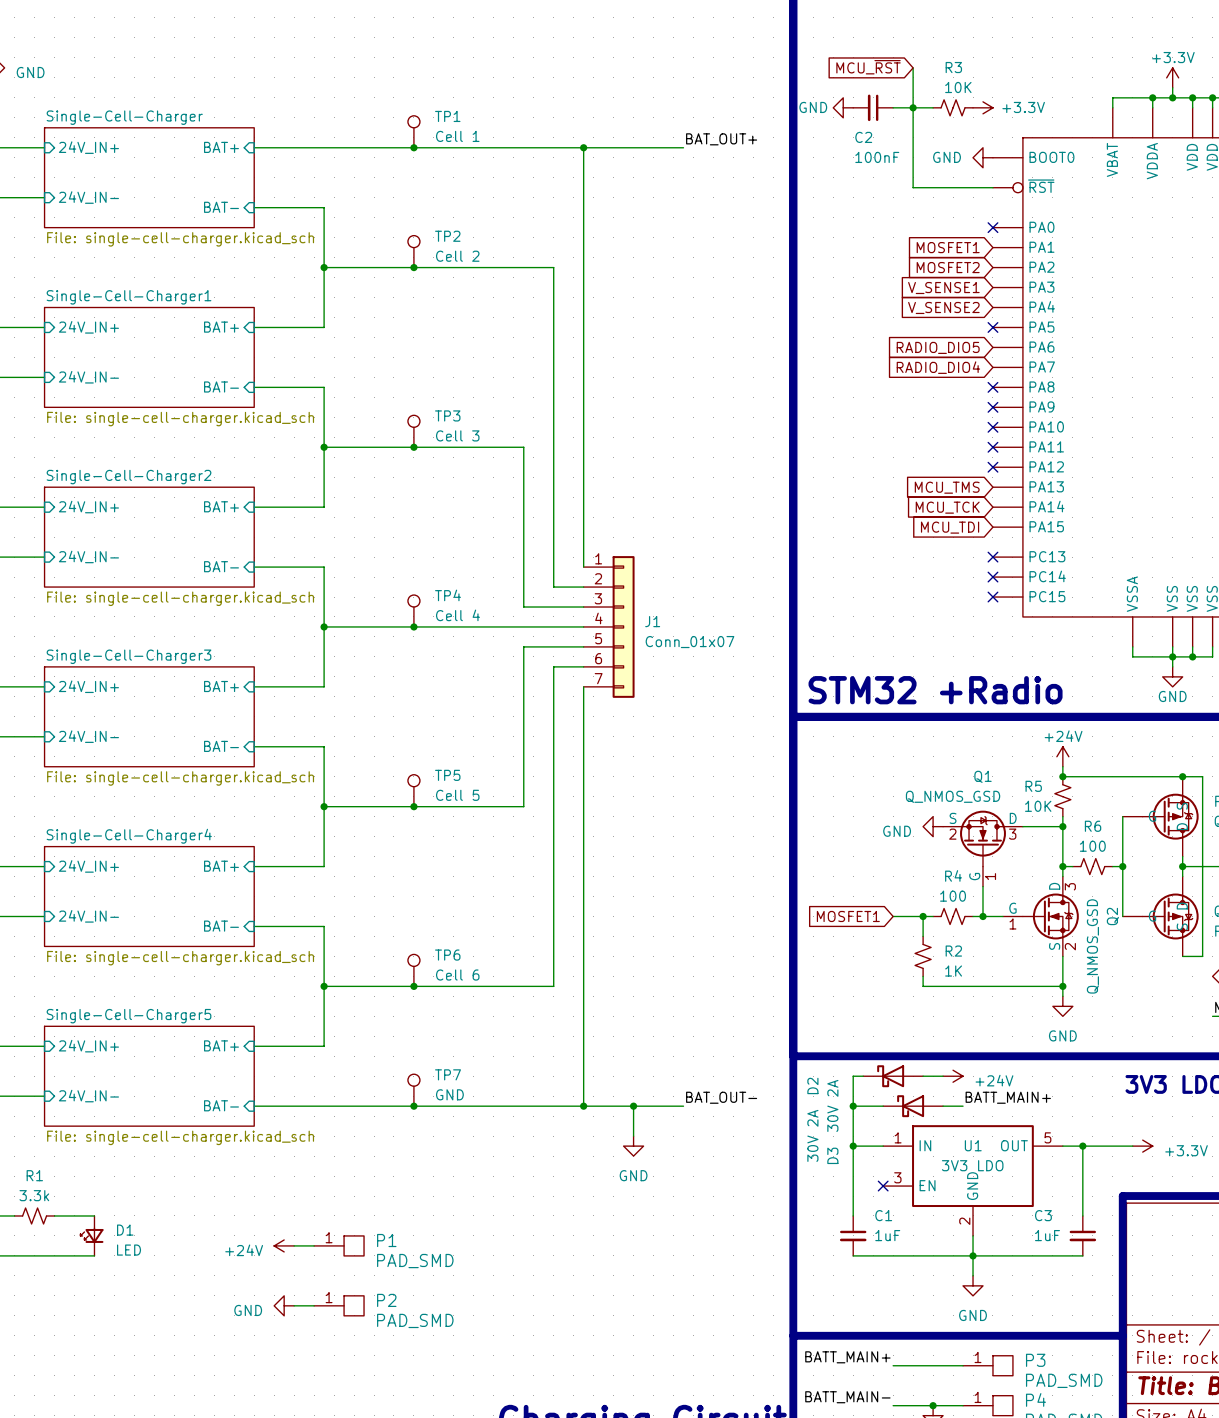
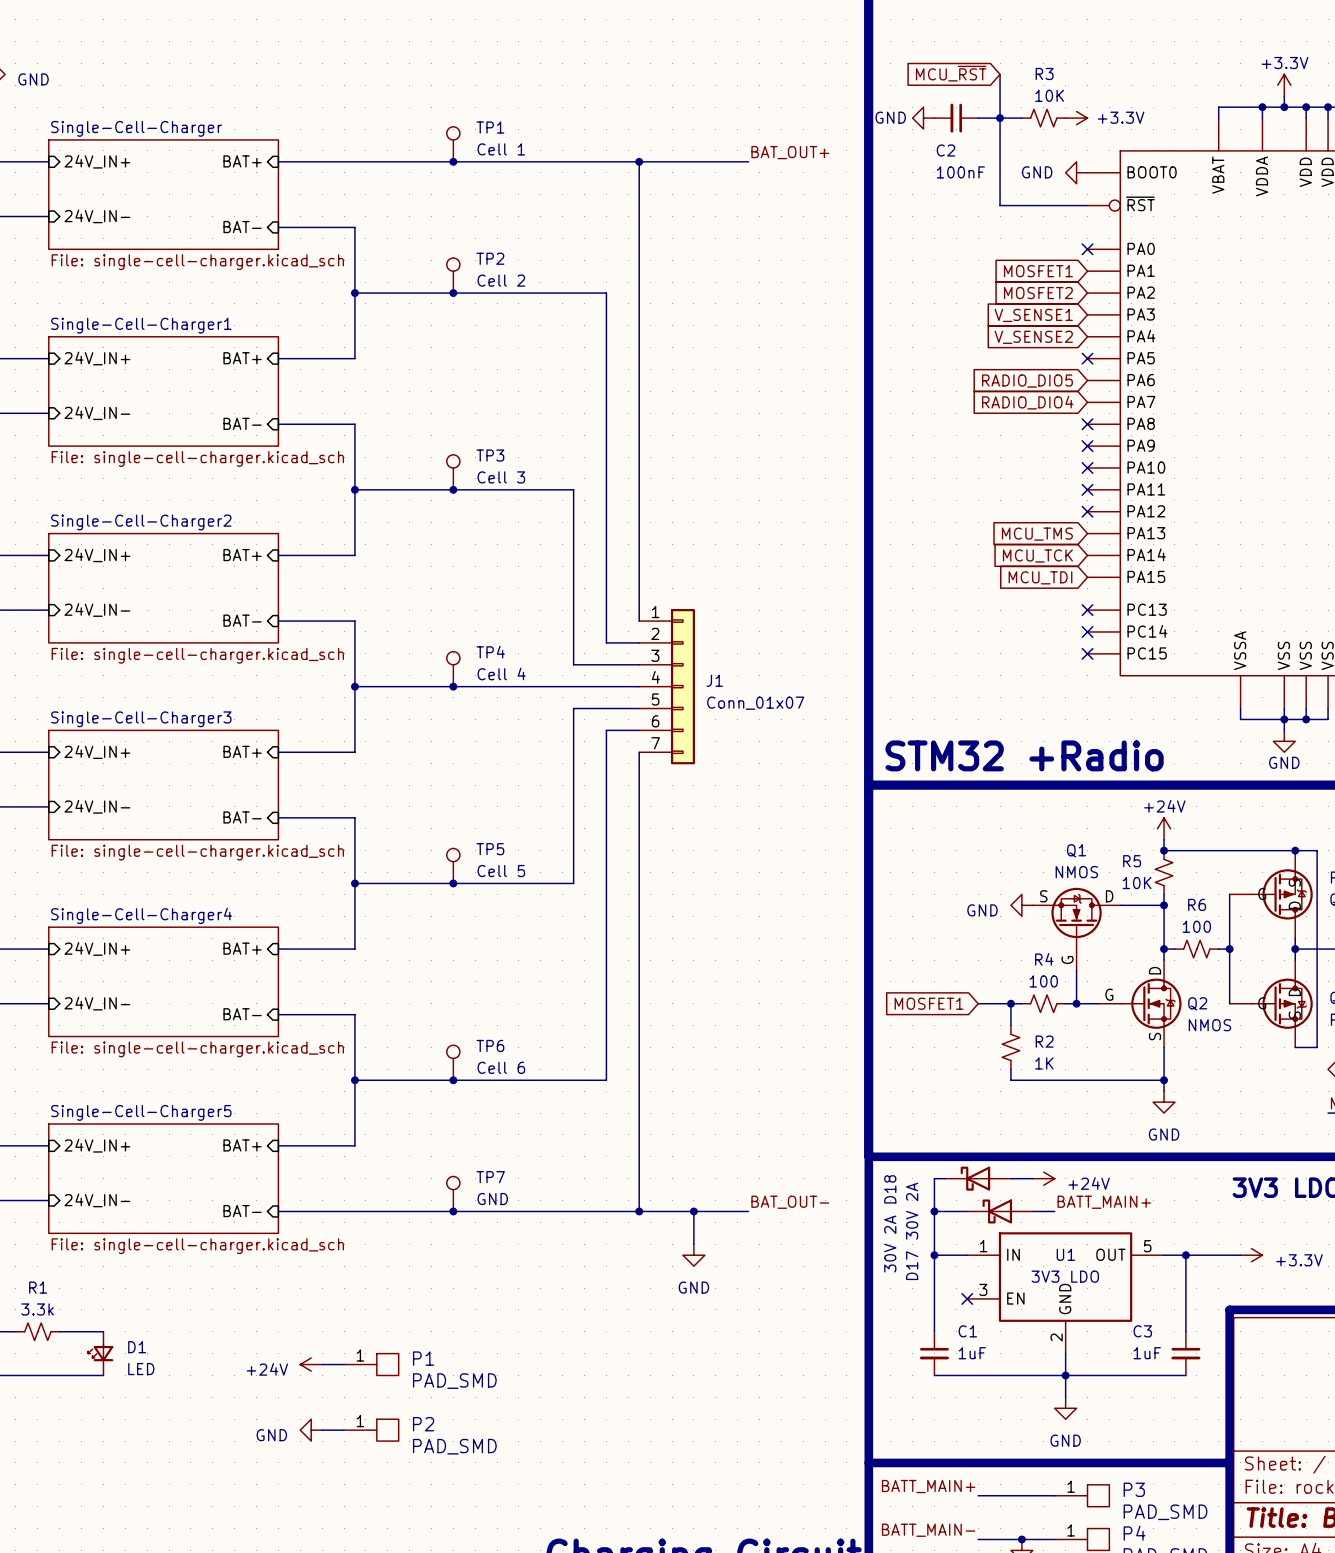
Q1 value: Q_NMOS_GSD (953, 796) -> NMOS (1076, 872)
Q1 pin number: 2 (952, 834) -> none
Q1 pin number: 3 (1012, 834) -> none
Q1 pin number: 1 (990, 876) -> none
Q2 pin number: 3 (1070, 886) -> none
Q2 name rotation: 0° (1112, 916) -> 90° clockwise (1197, 1003)
Q2 pin number: 1 (1012, 923) -> none
Q2 pin number: 2 (1070, 946) -> none
Q2 value: Q_NMOS_GSD (1092, 946) -> NMOS (1209, 1025)
D2 name: D2 (812, 1085) -> D18 (890, 1189)
D3 name: D3 (832, 1155) -> D17 (912, 1265)

